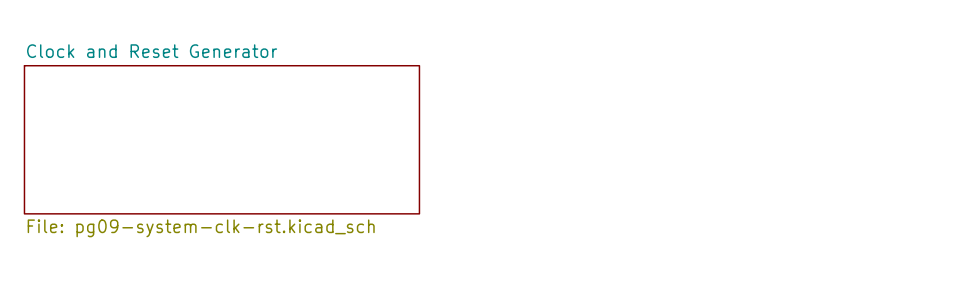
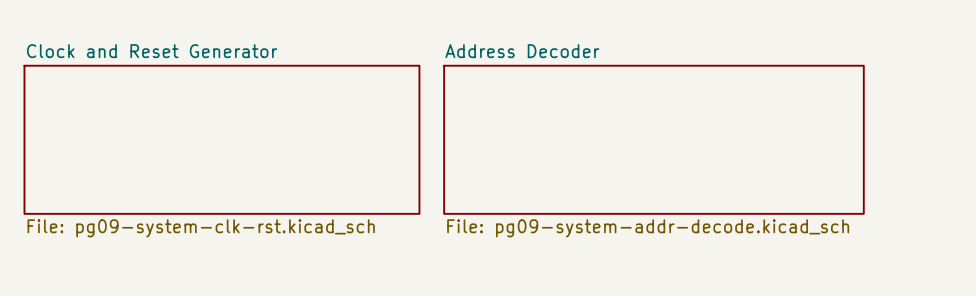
sheet Address Decoder: none -> File: pg09-system-addr-decode.kicad_sch (653, 139)

